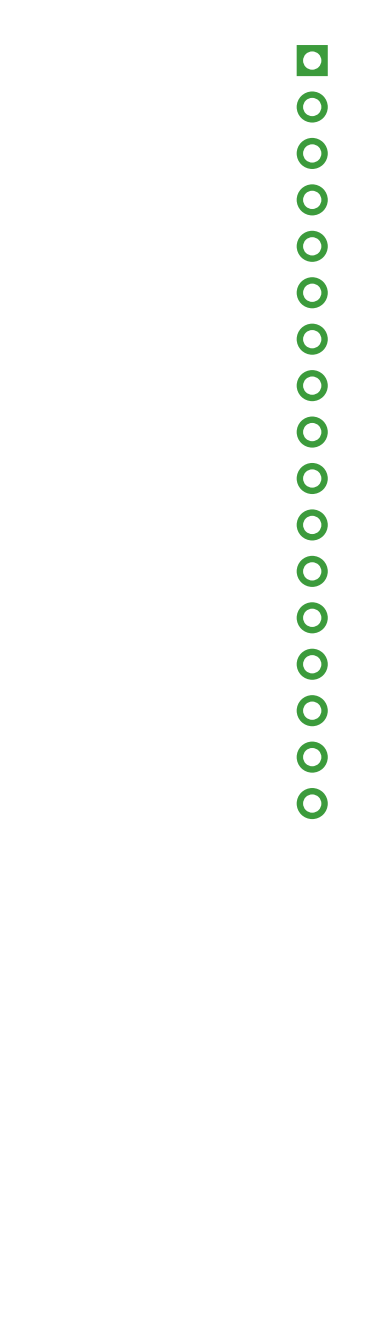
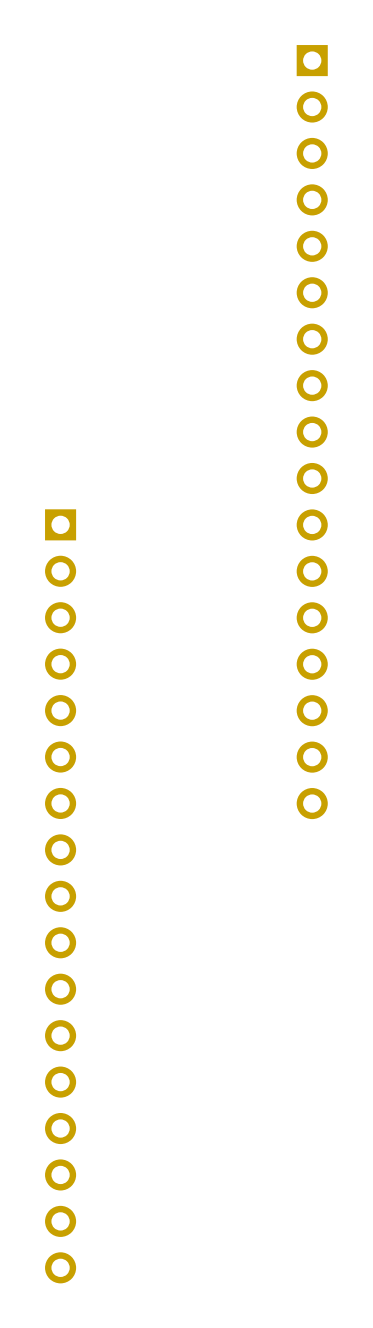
part: none -> (60, 896)

